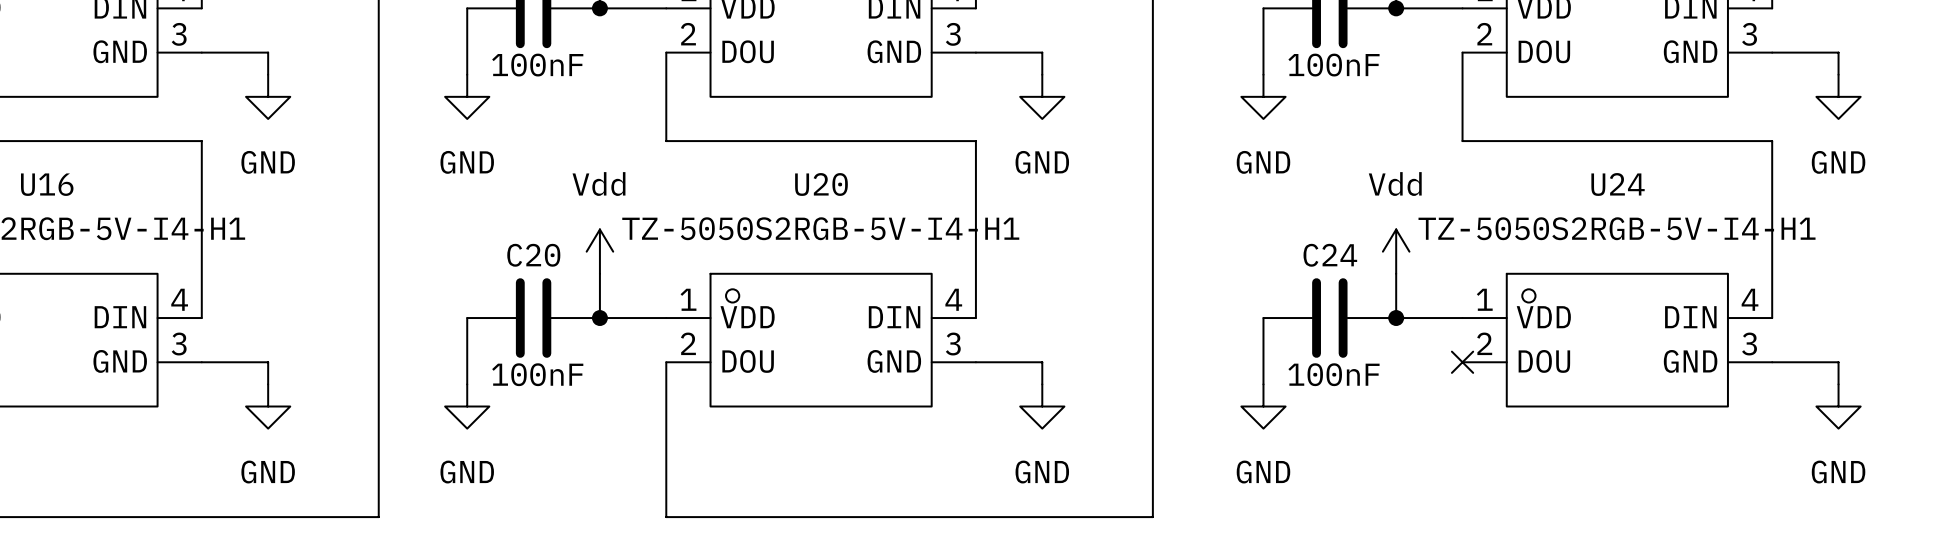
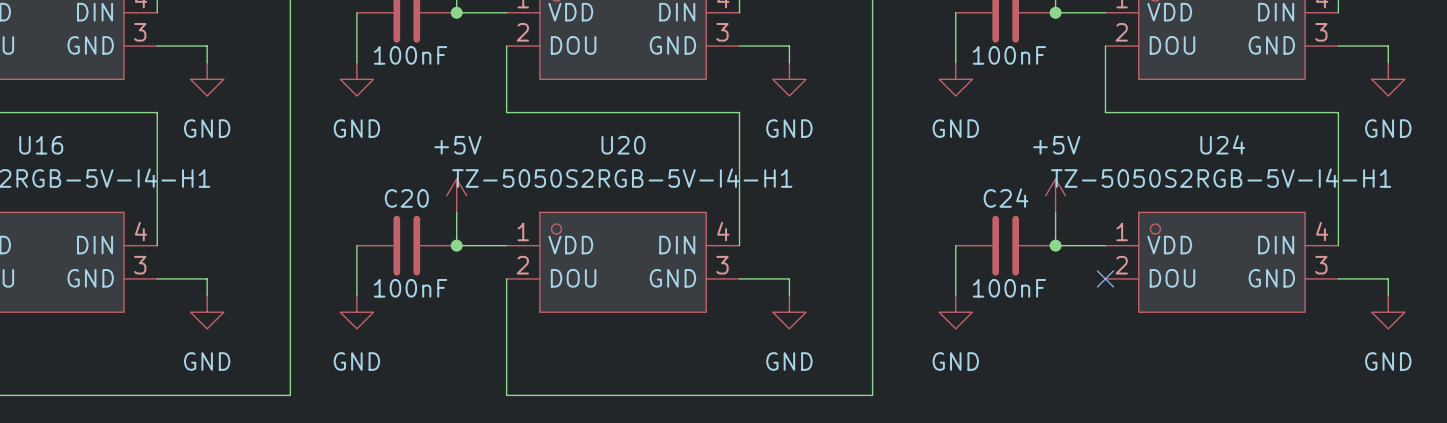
power symbol: Vdd (599, 251) -> +5V (456, 195)
power symbol: Vdd (1396, 251) -> +5V (1055, 195)

